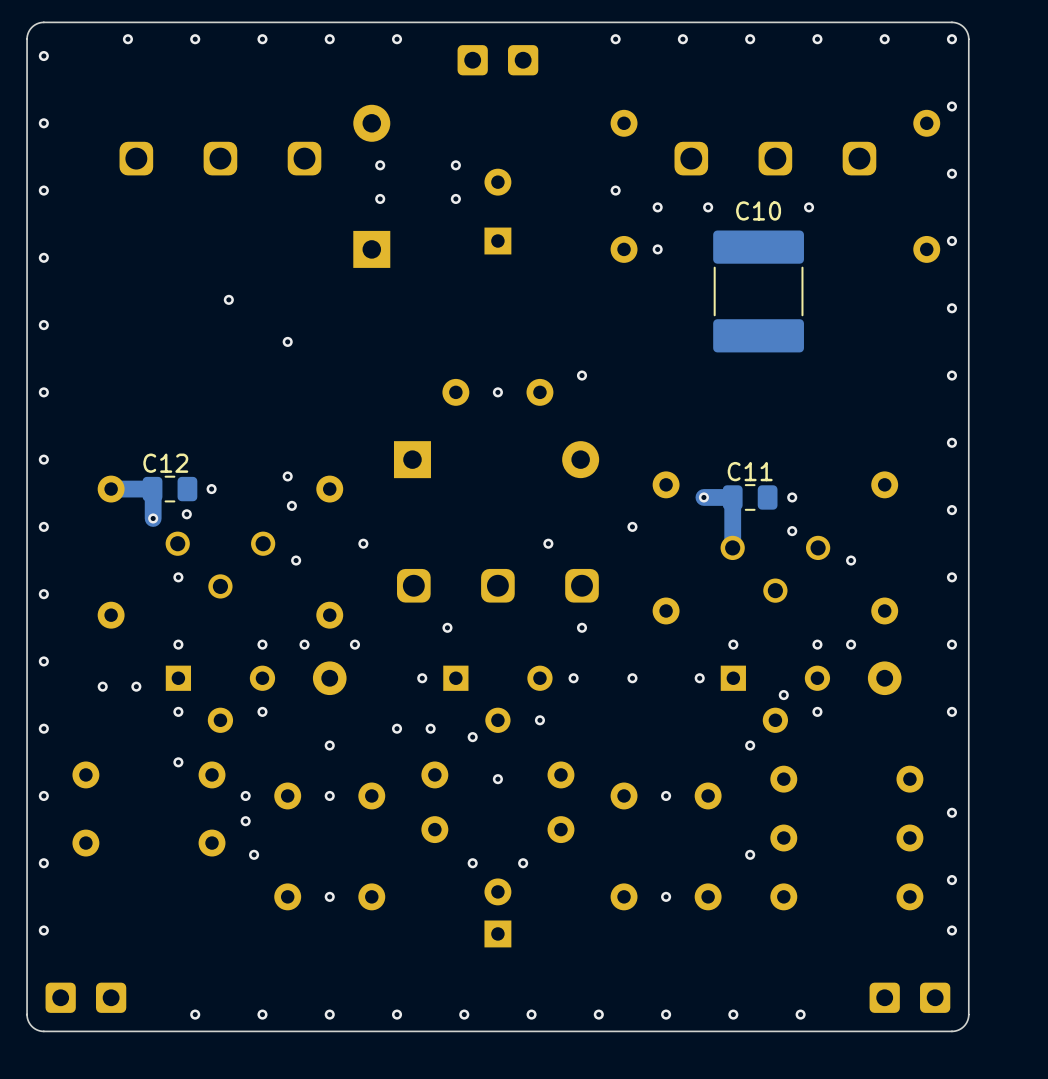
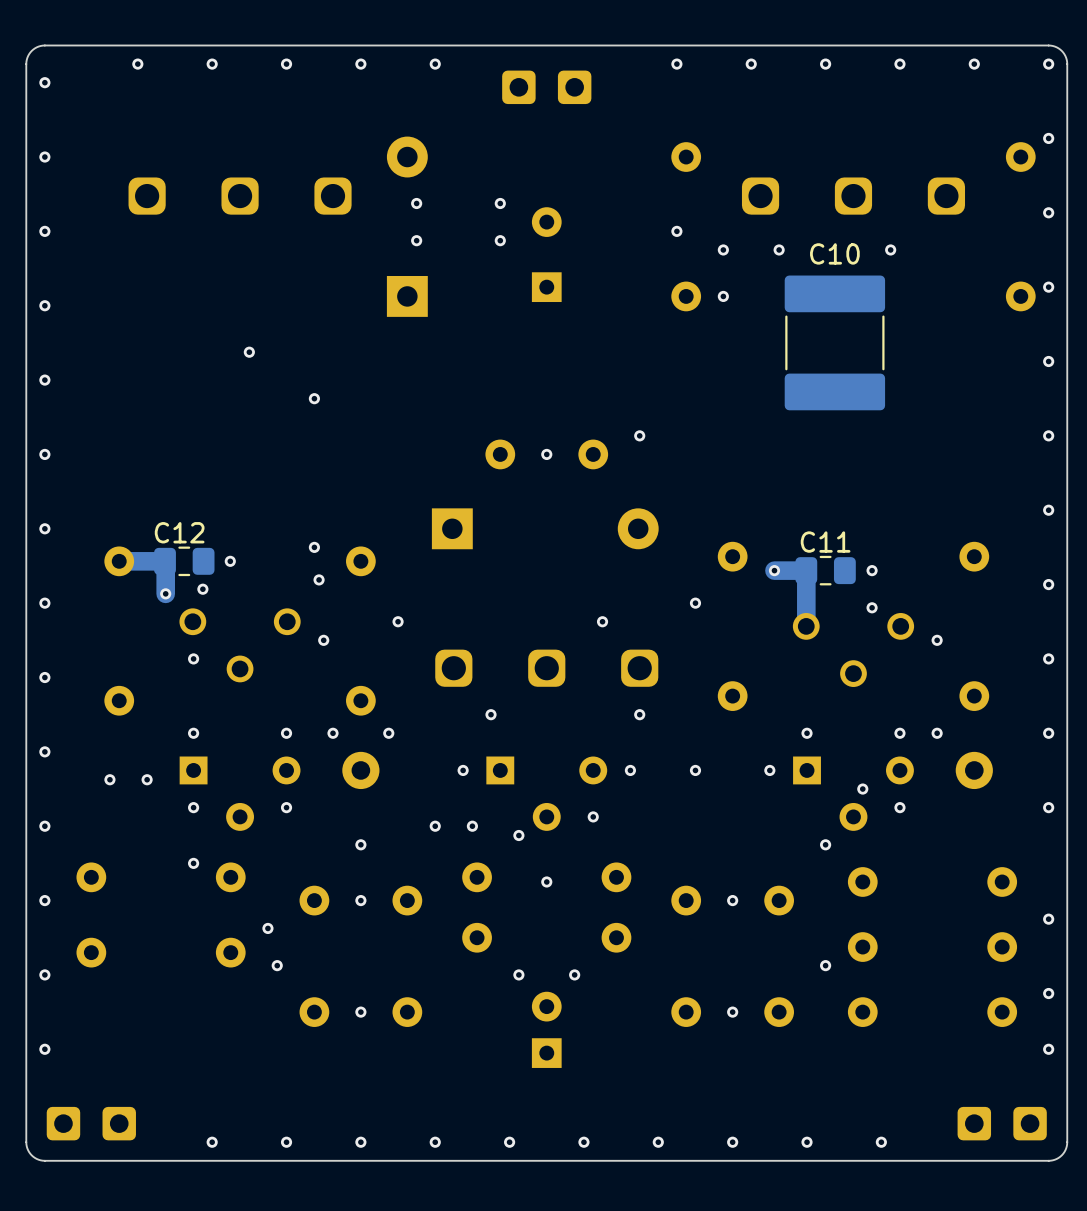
via: (245, 795) -> none

